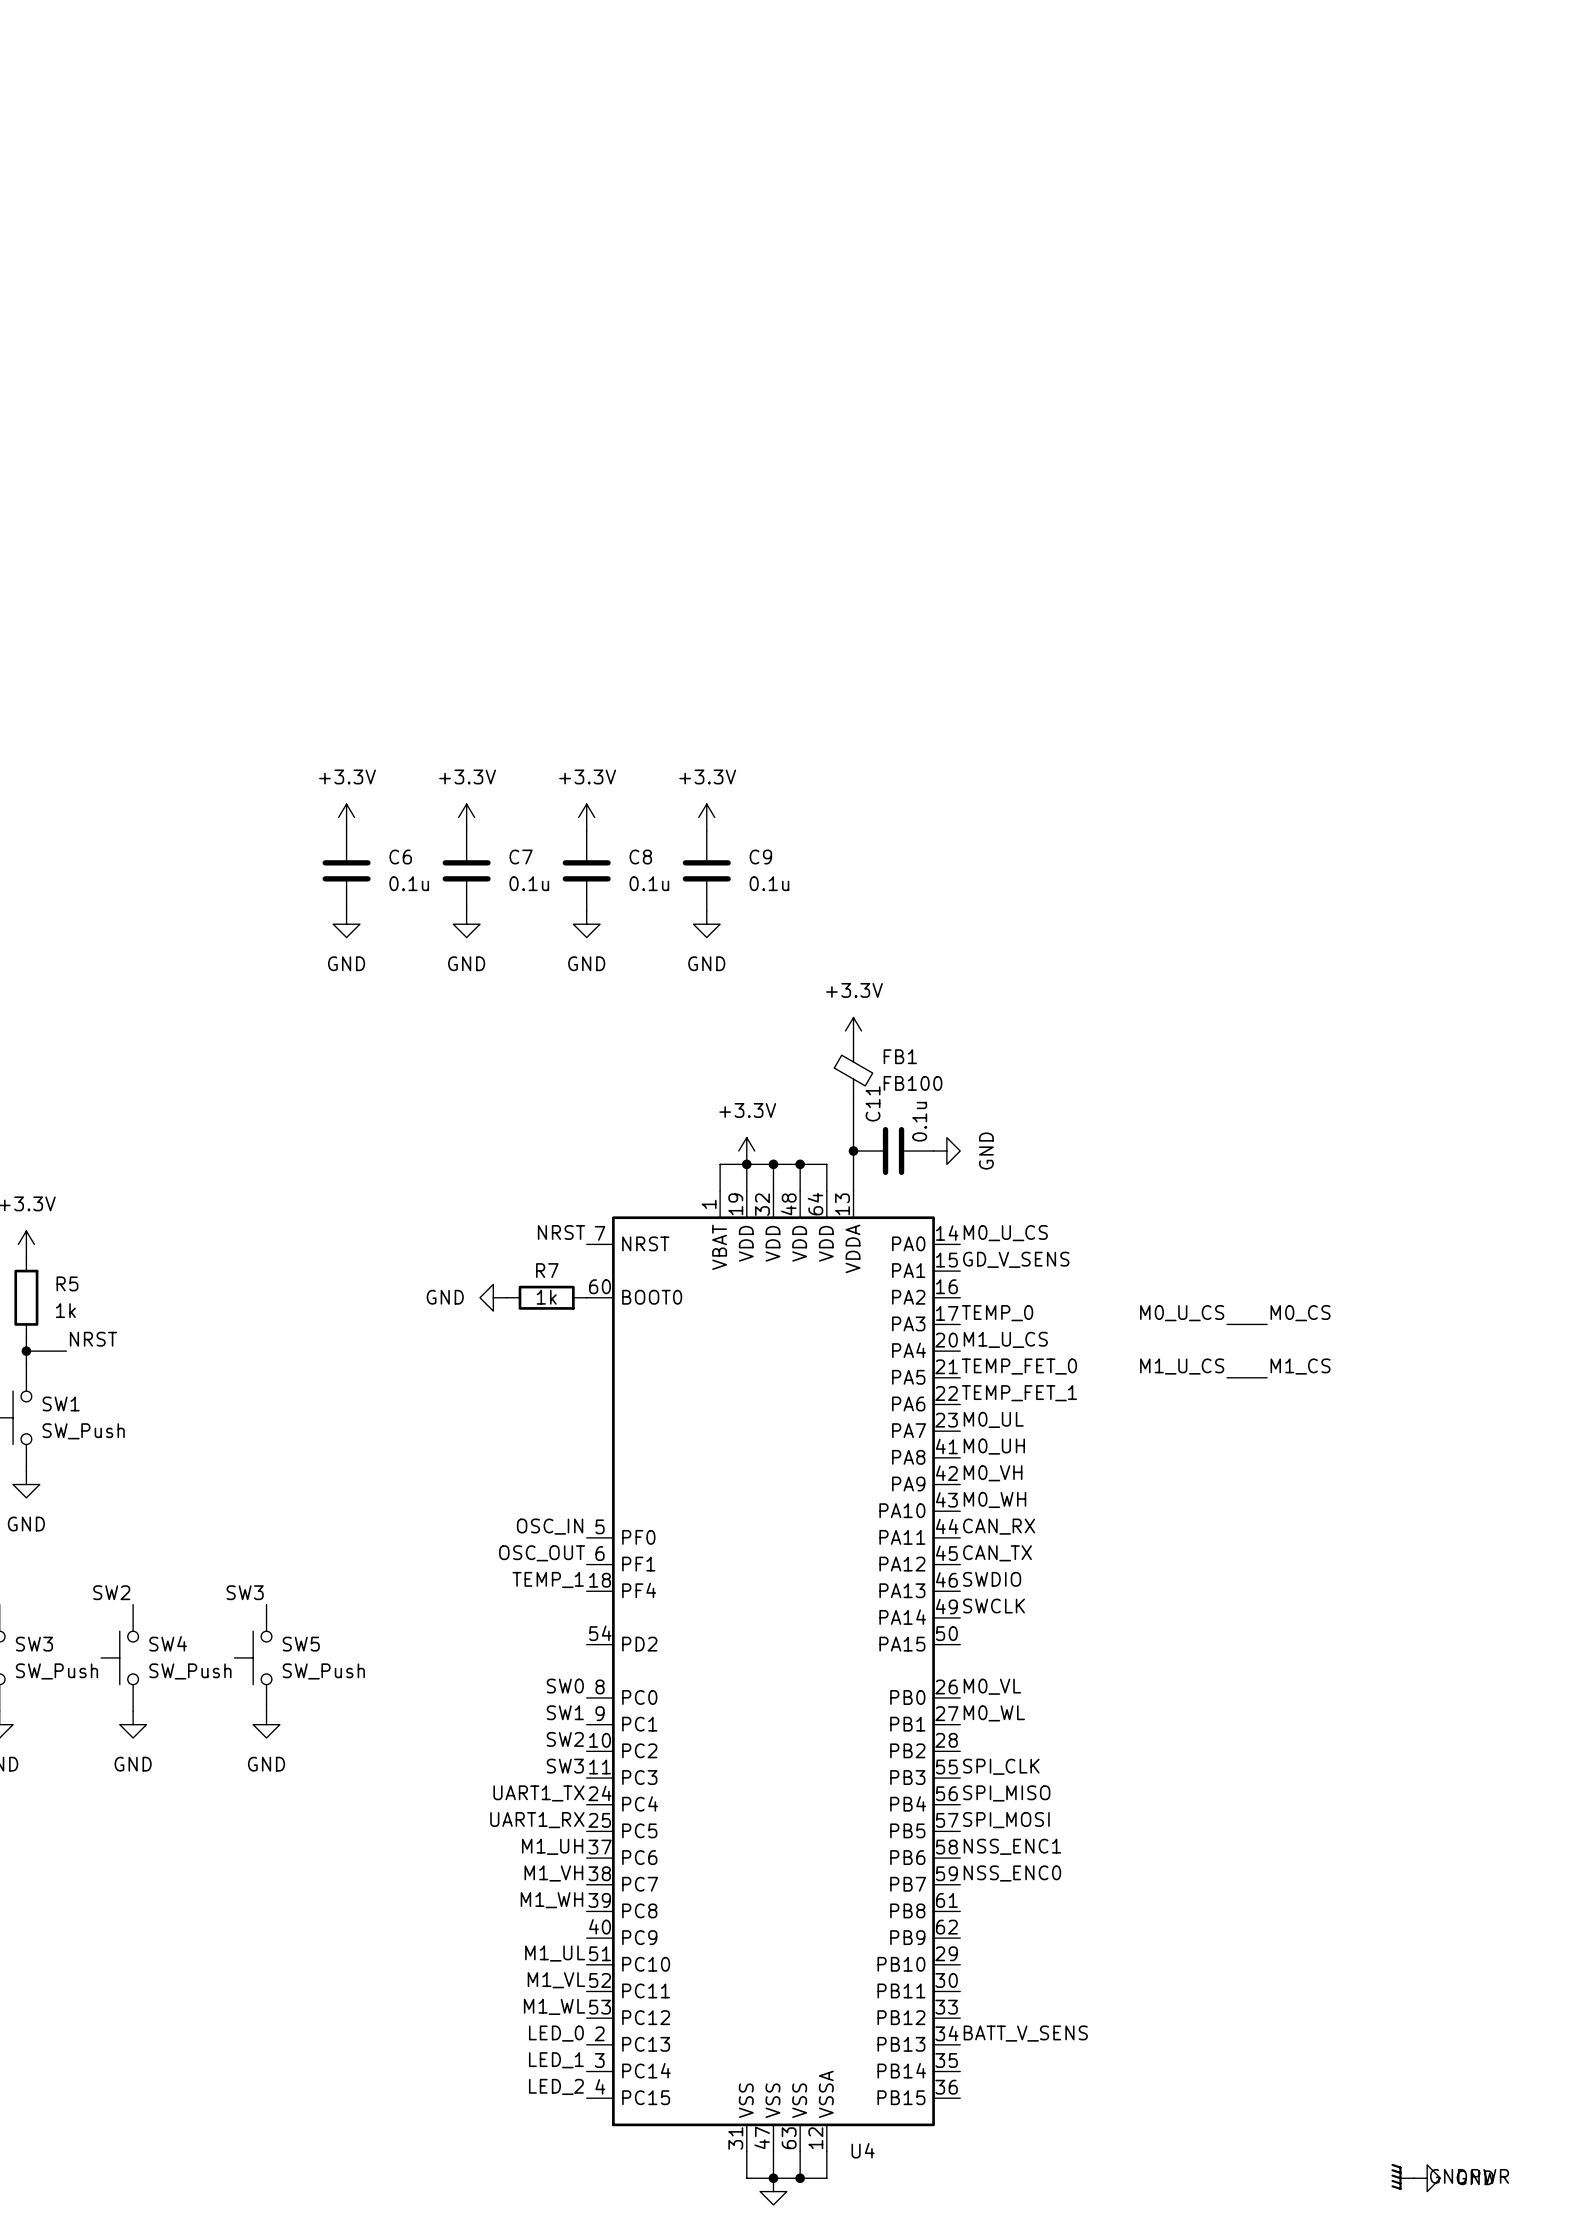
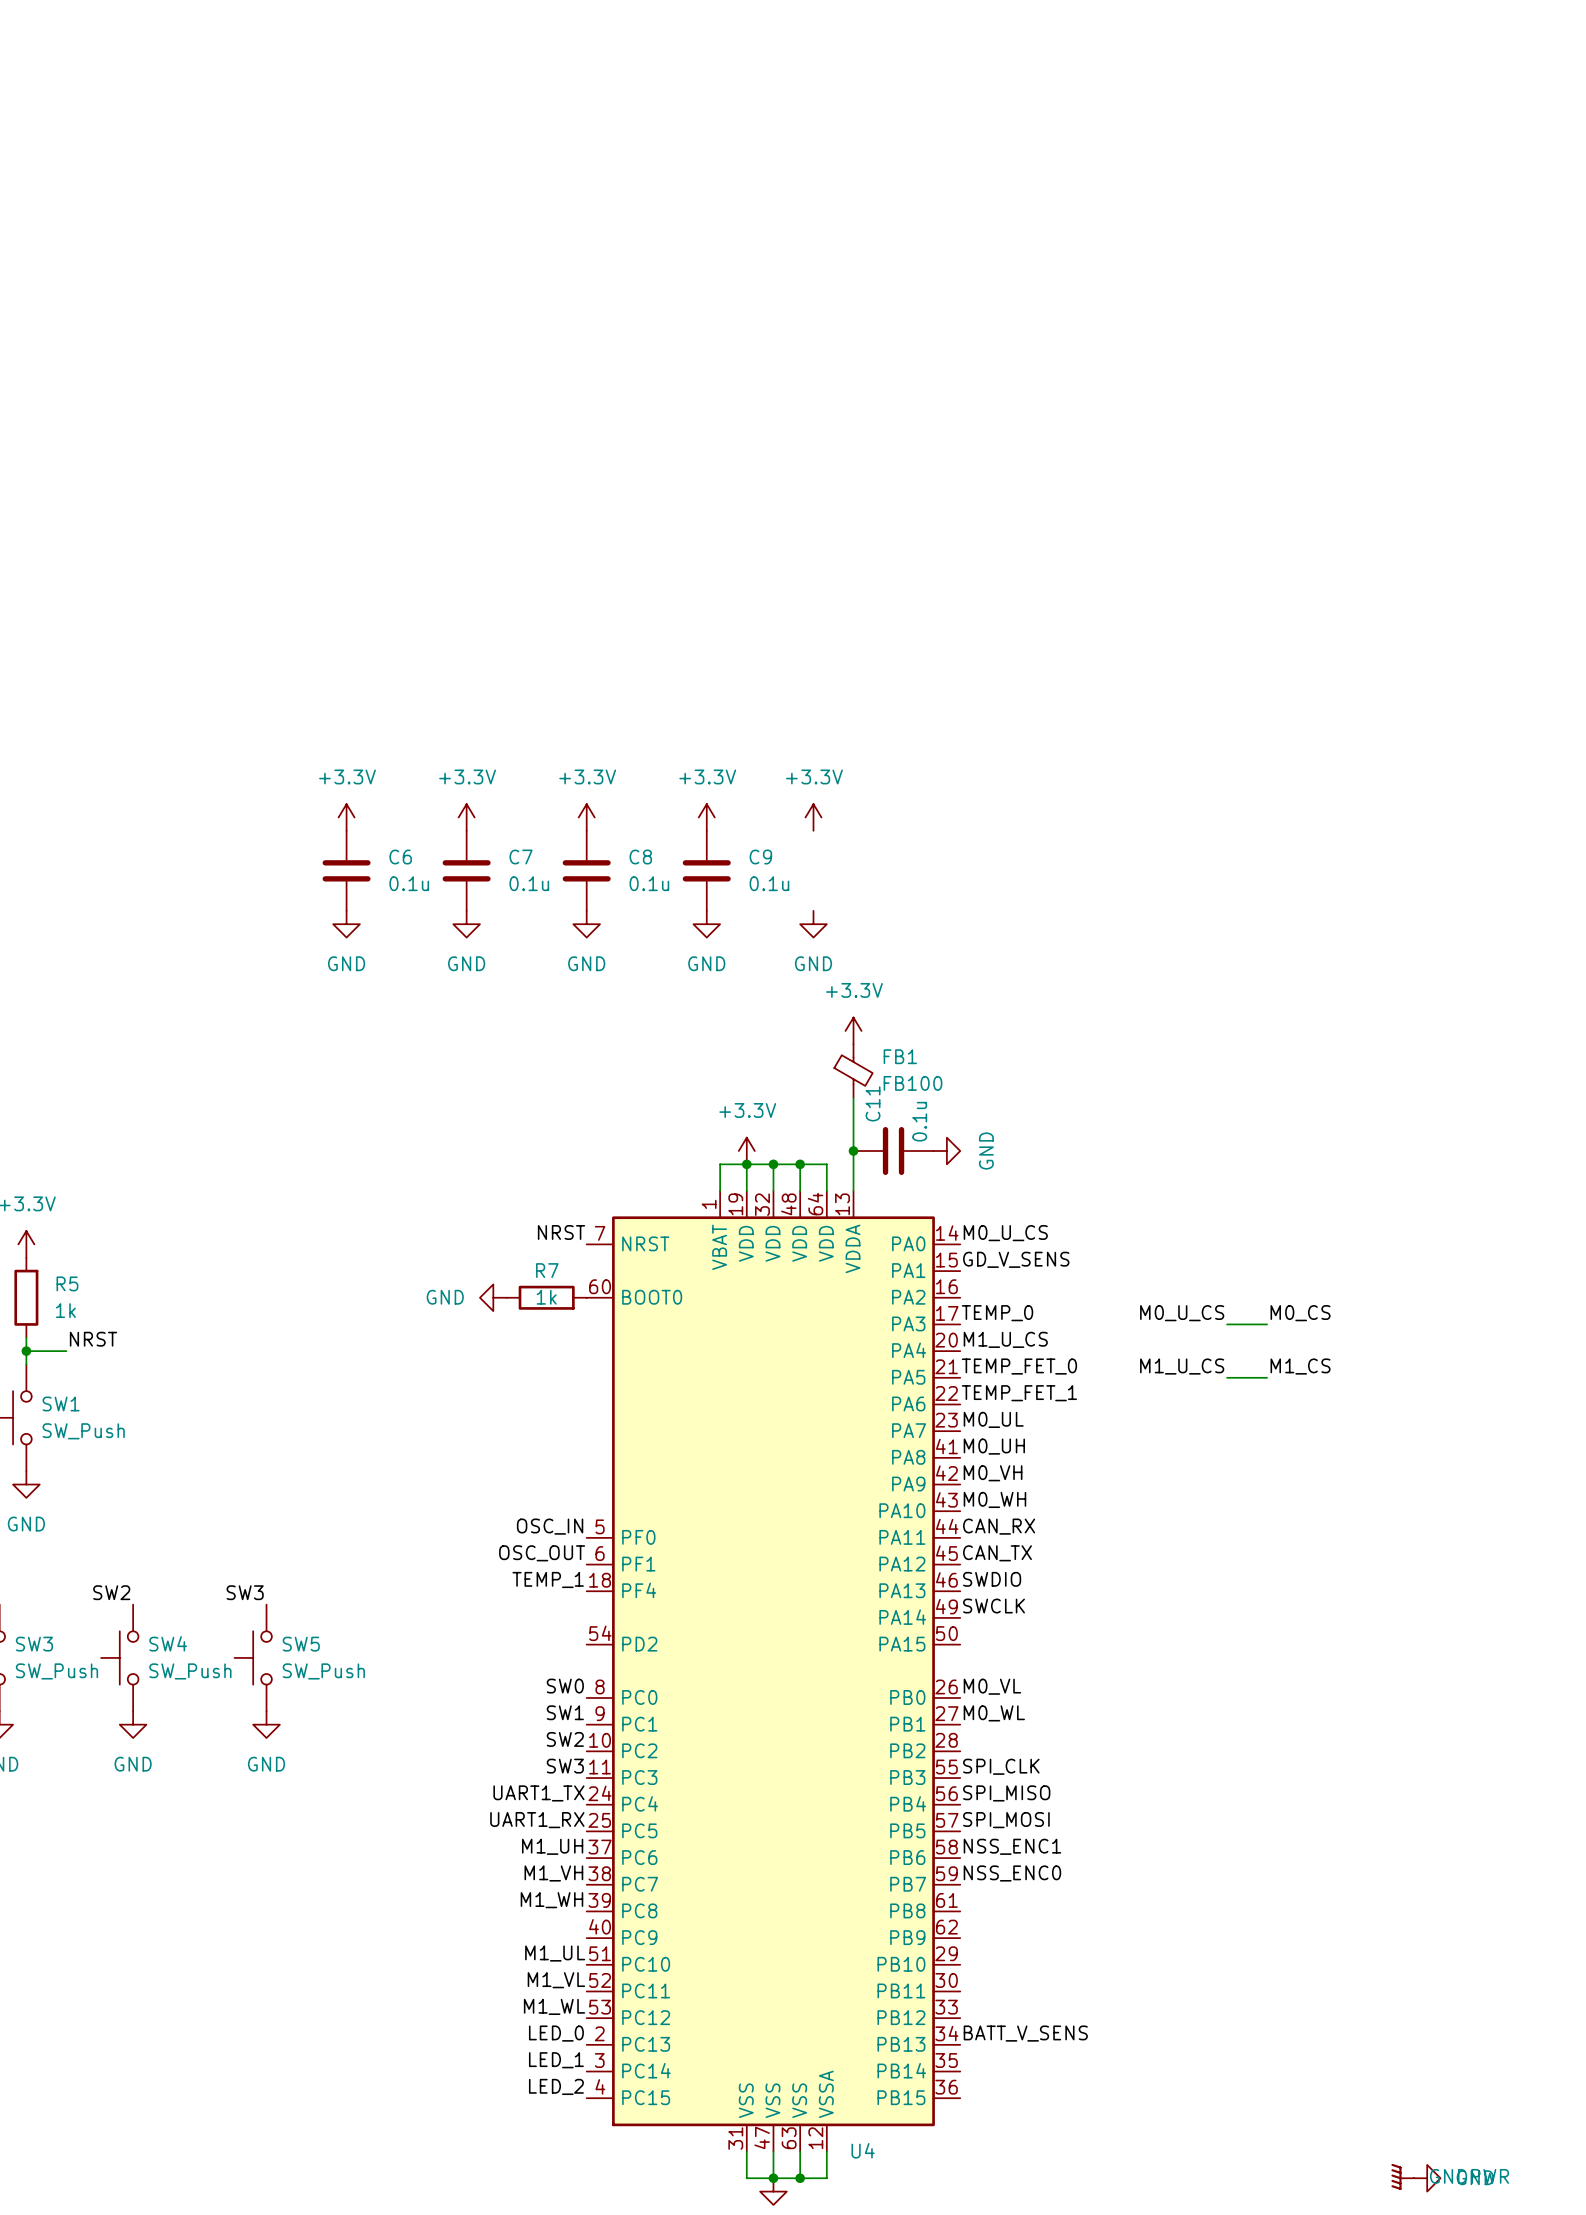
power symbol: none -> +3.3V (813, 817)
power symbol: none -> GND (813, 924)

